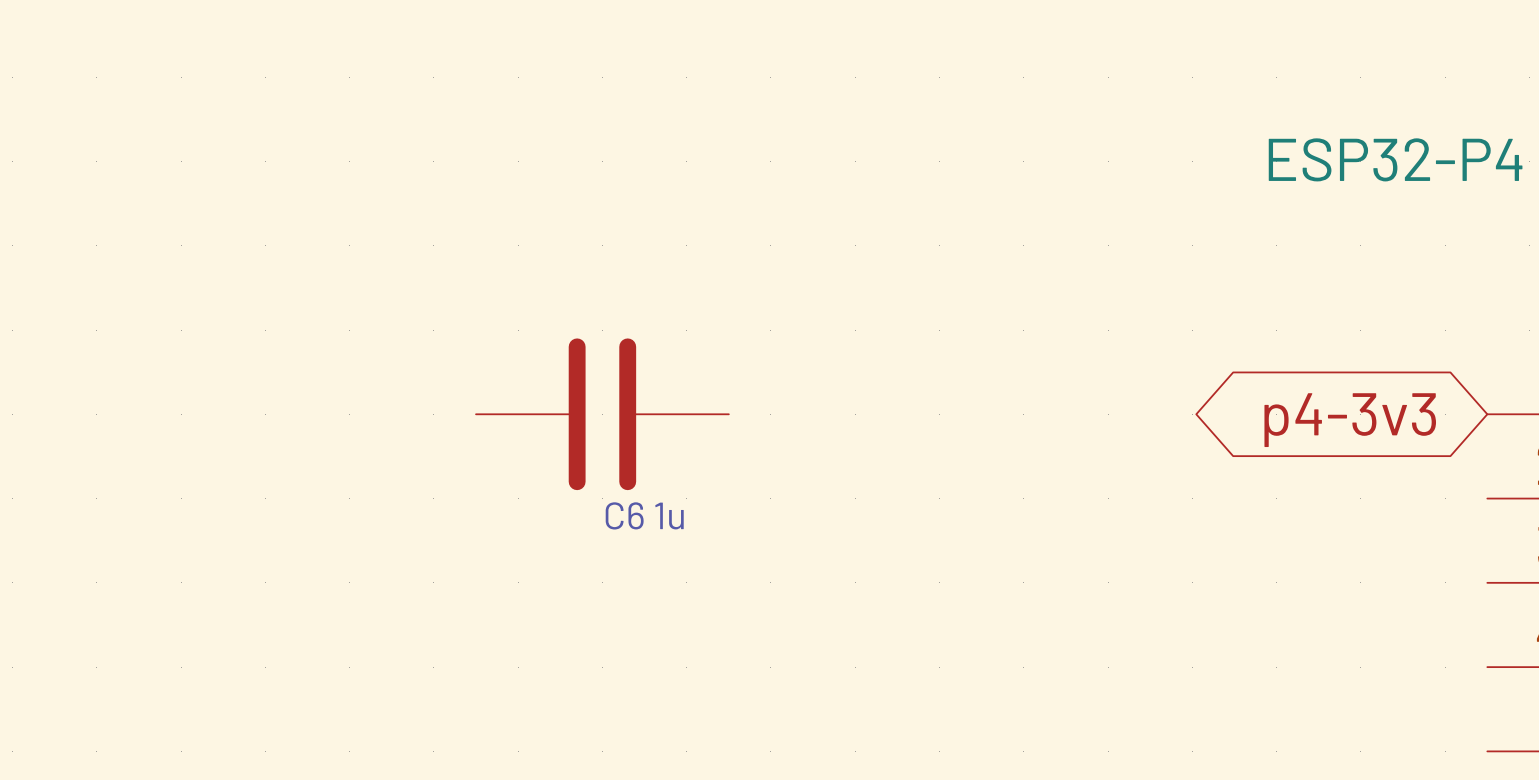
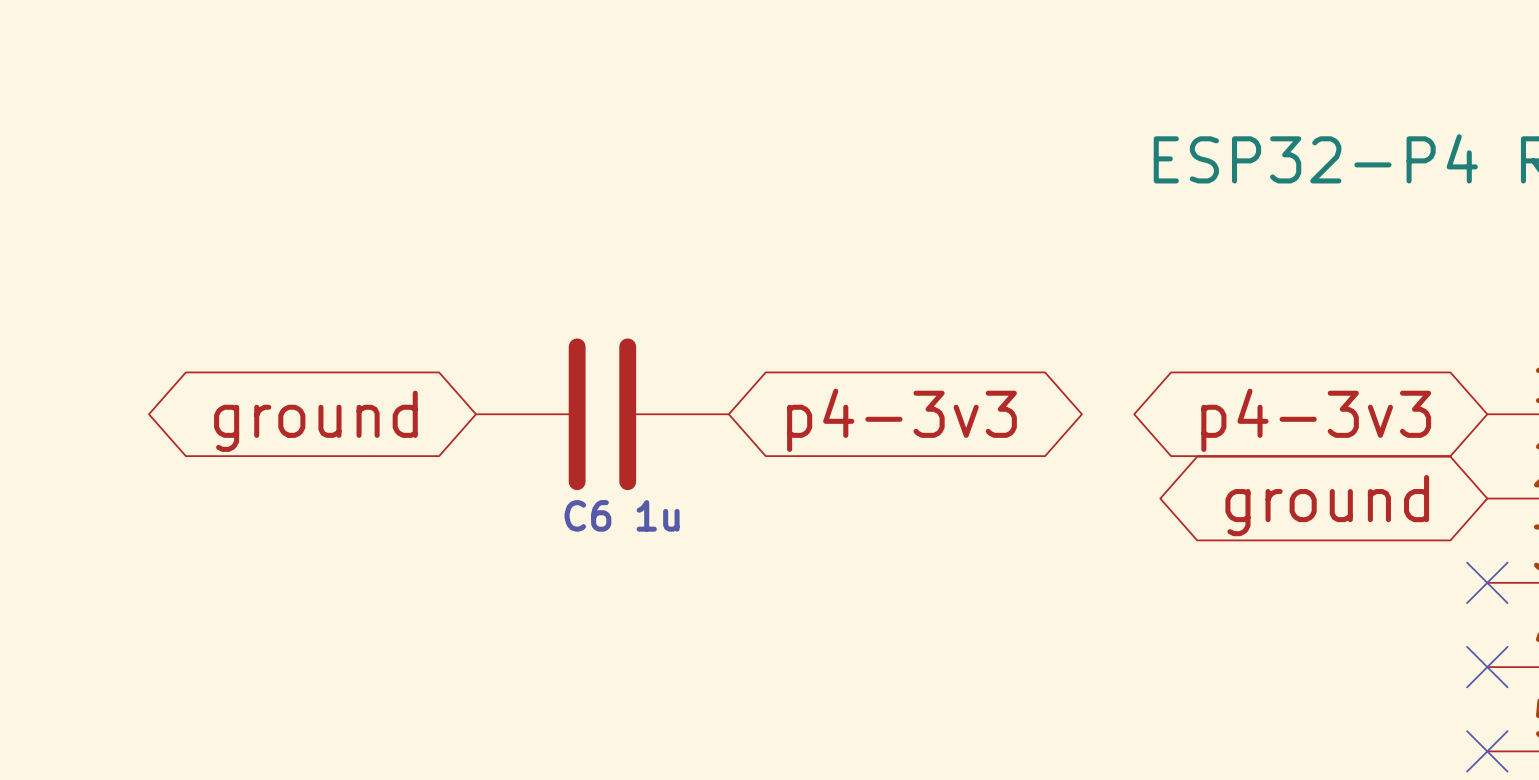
global label: none -> ground (315, 421)
global label: none -> p4-3v3 (901, 420)
global label: none -> ground (1327, 505)
no-connect mark: none -> (1487, 582)
no-connect mark: none -> (1487, 667)
no-connect mark: none -> (1487, 751)

